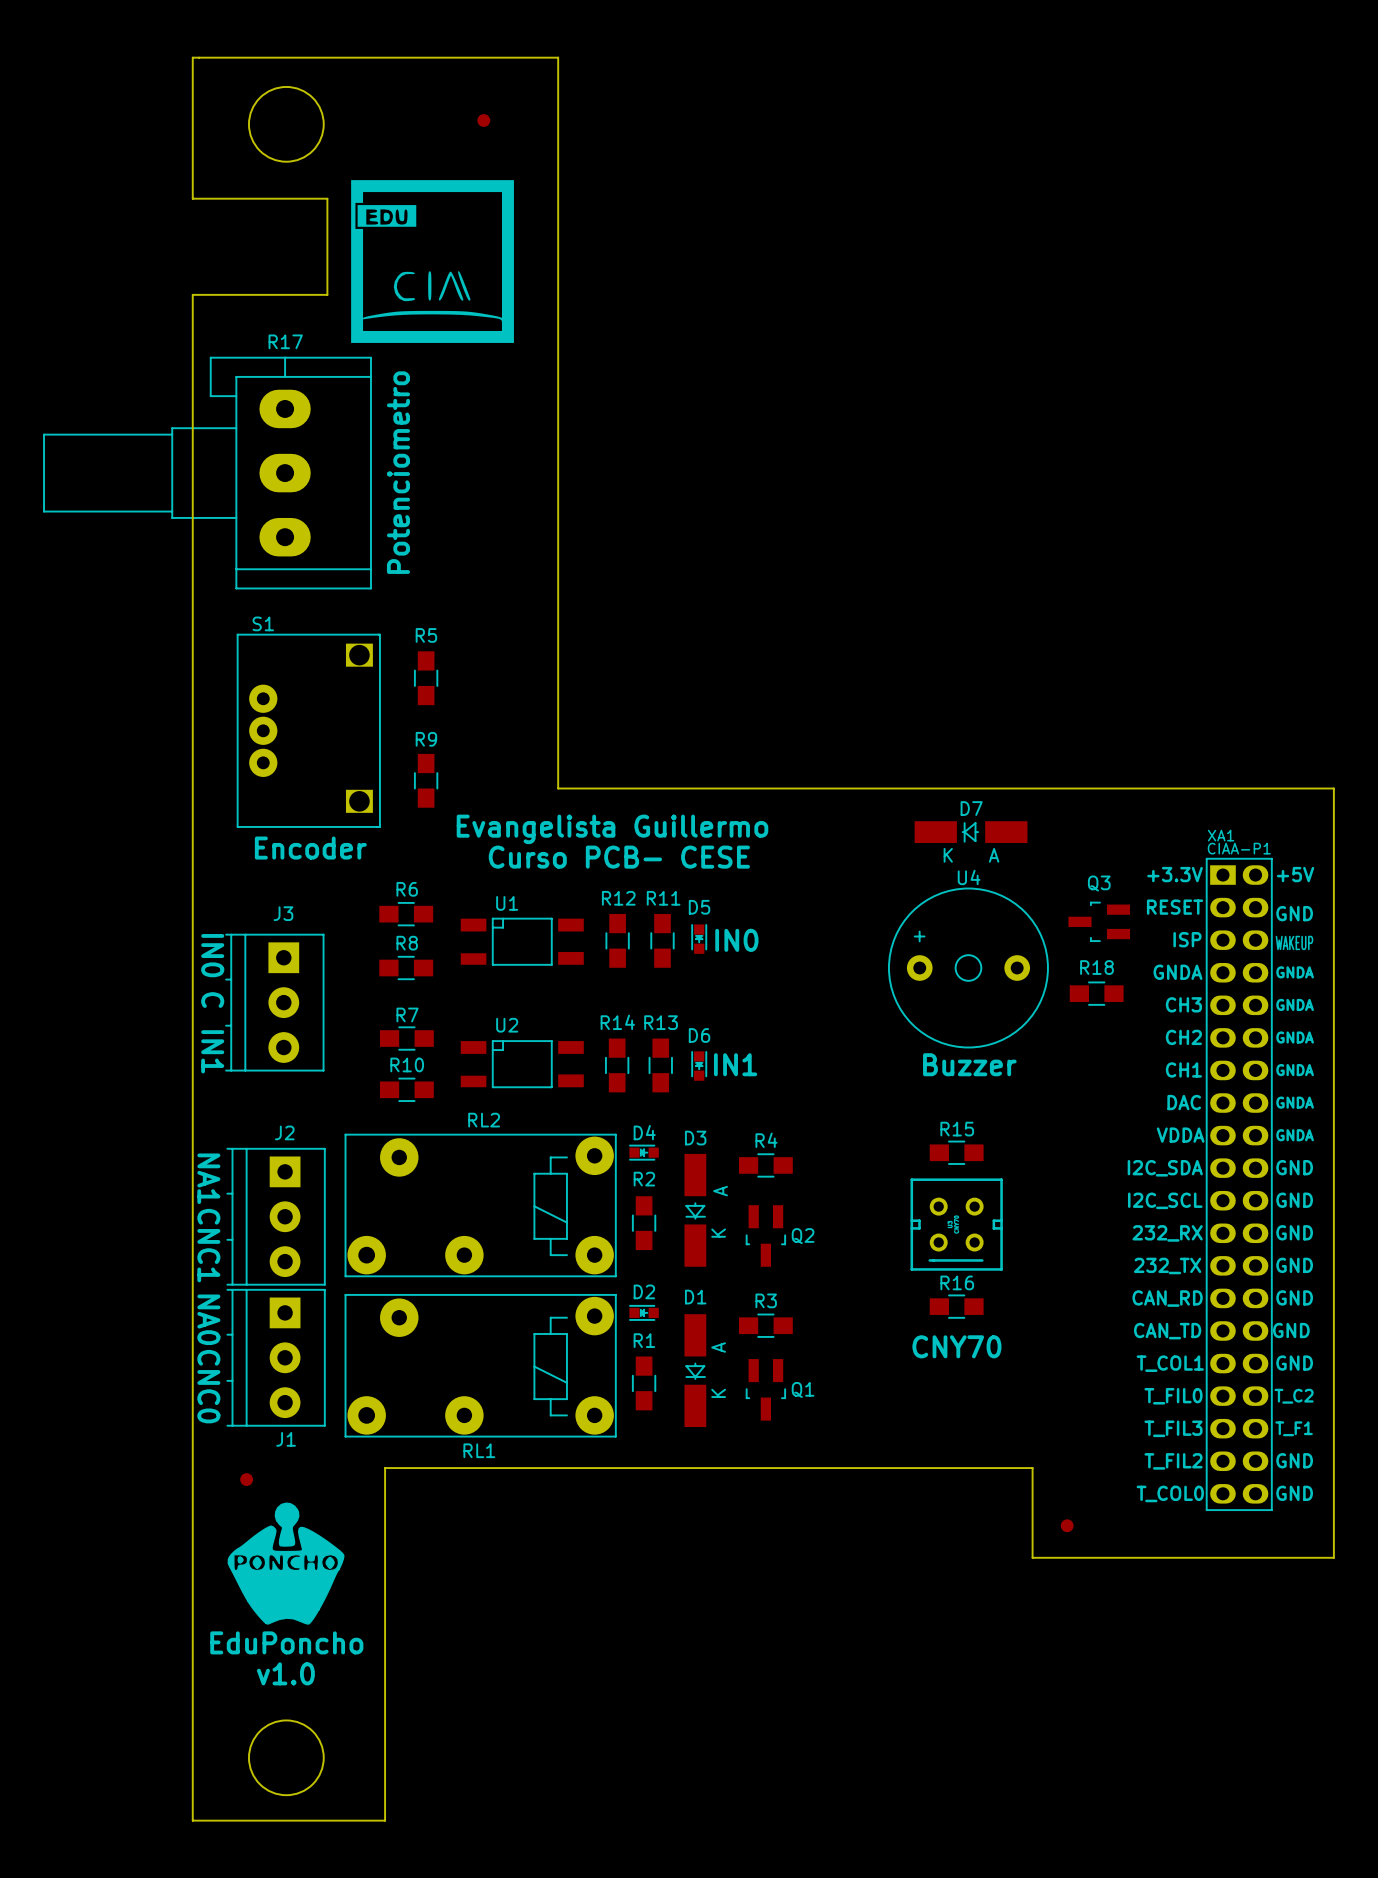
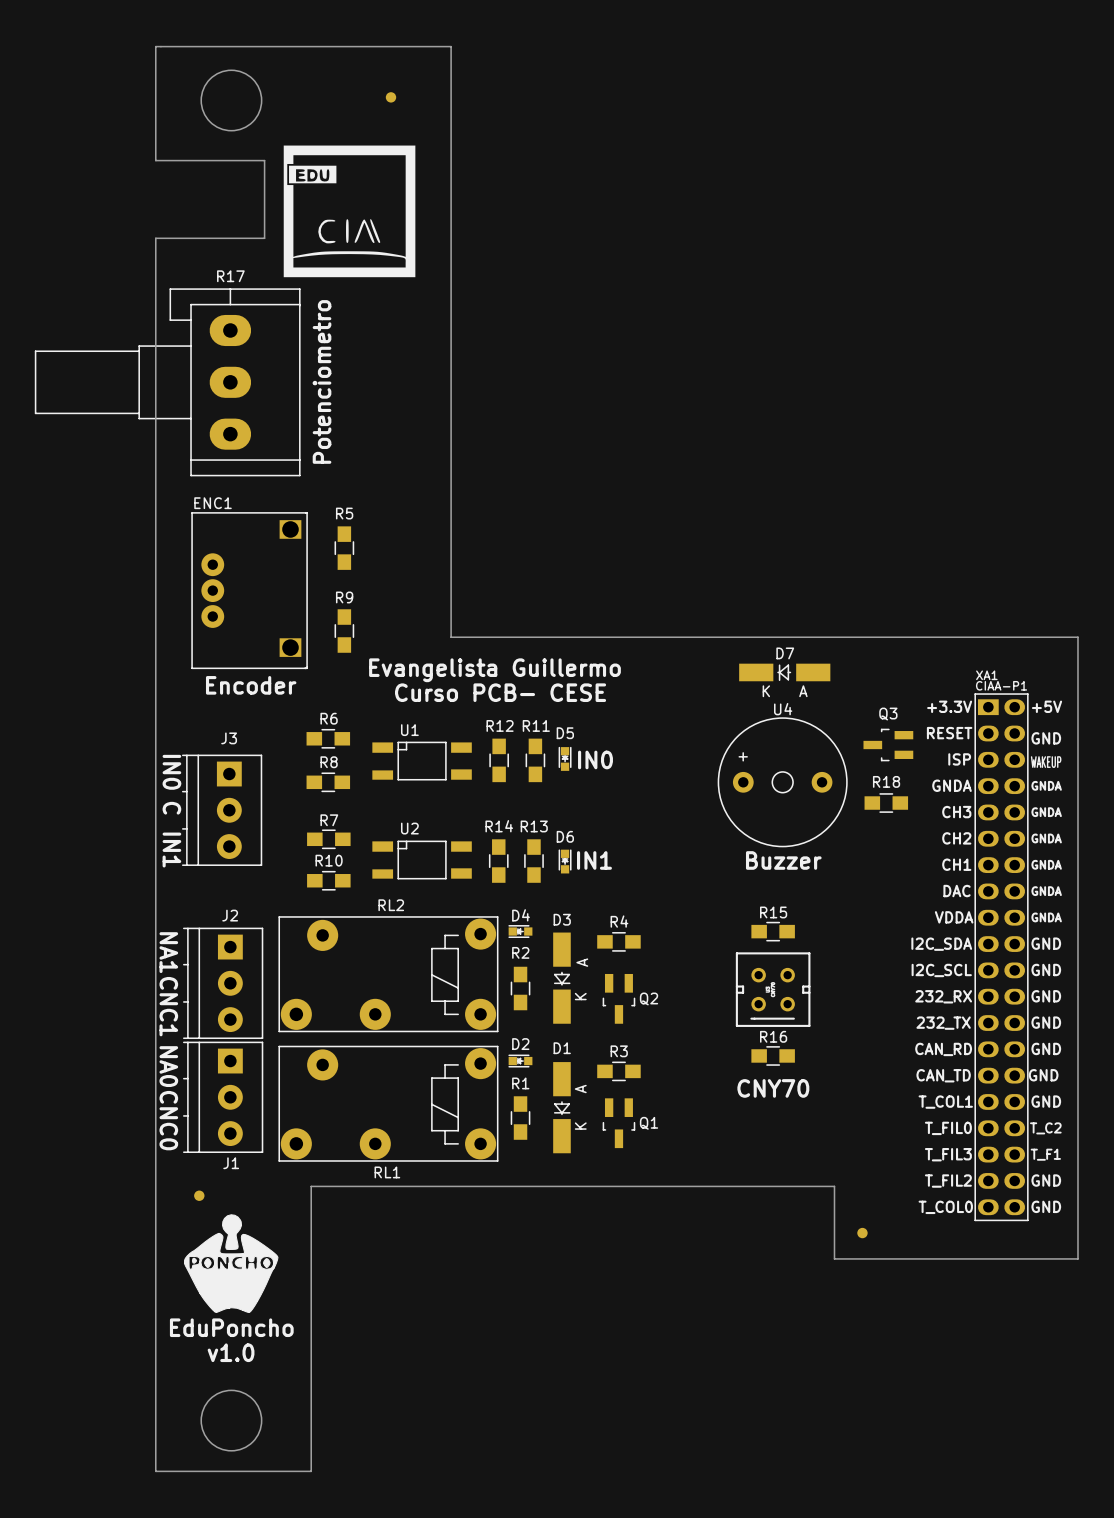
S1 name: S1 (263, 623) -> ENC1 (213, 503)

